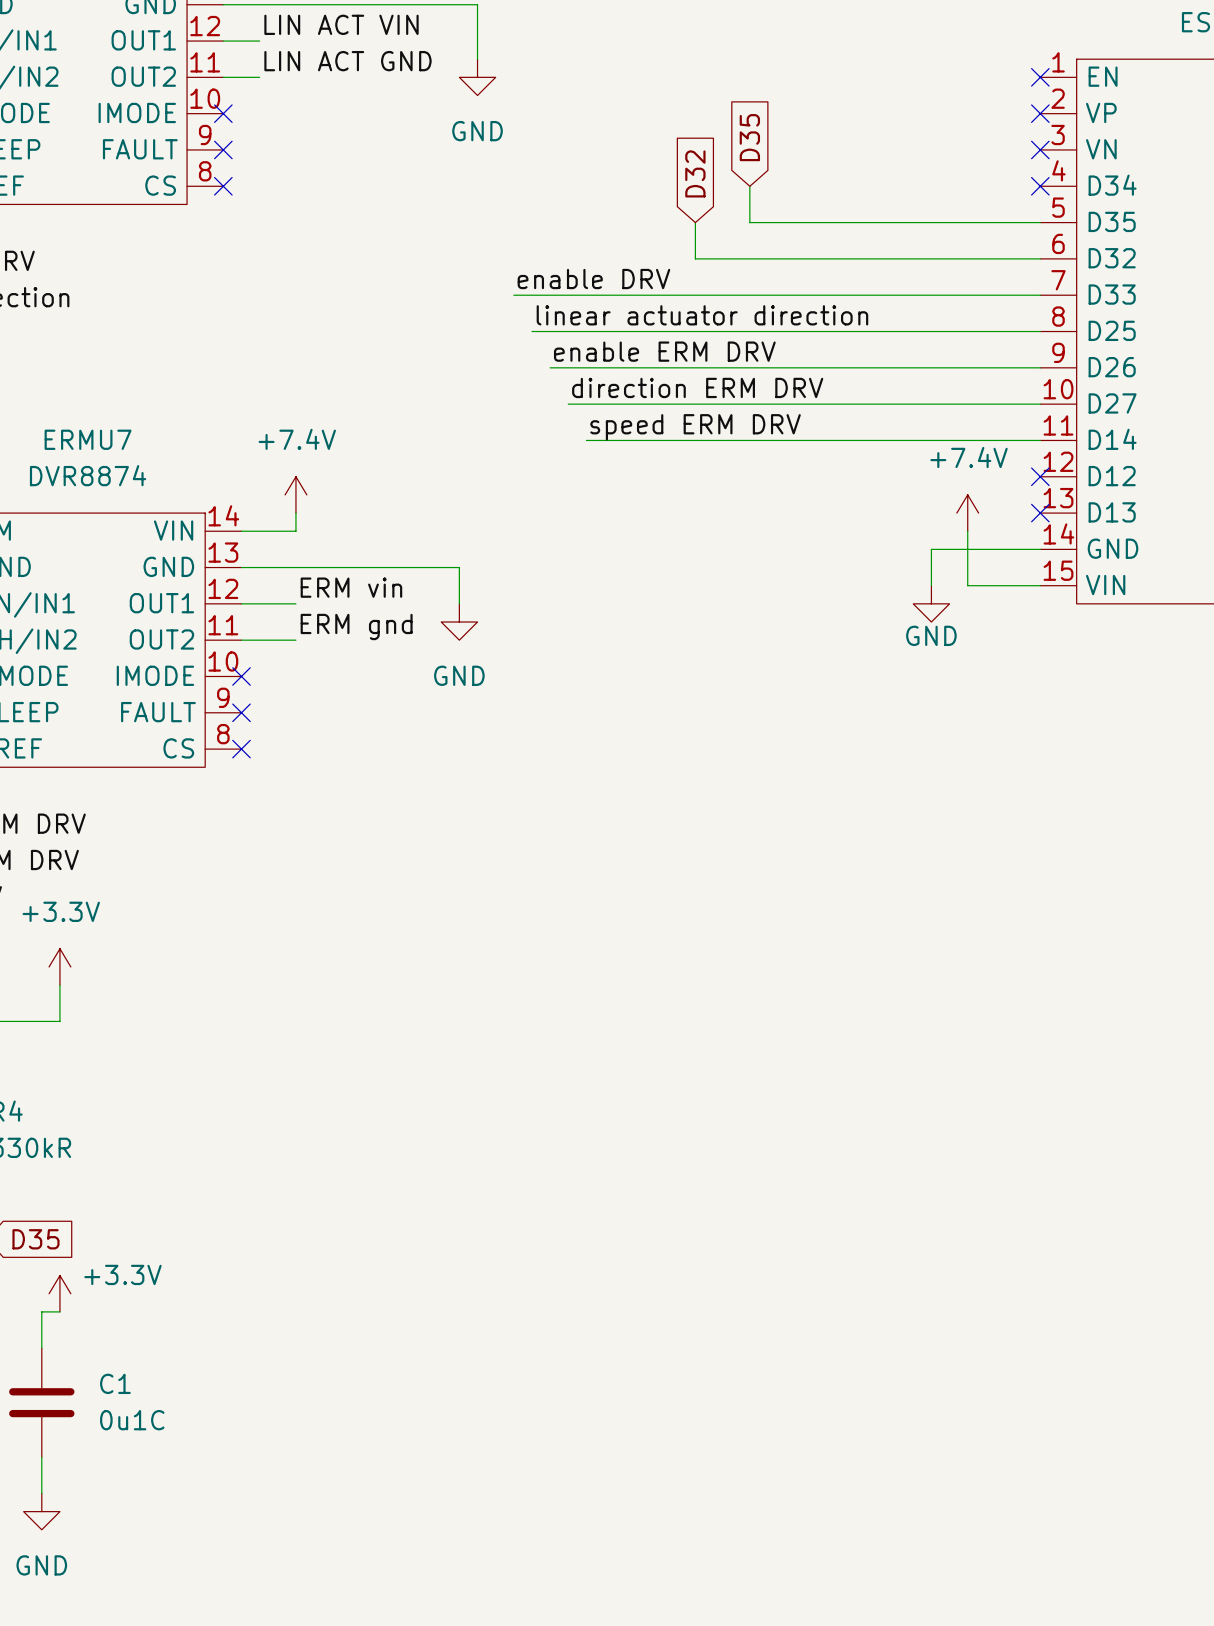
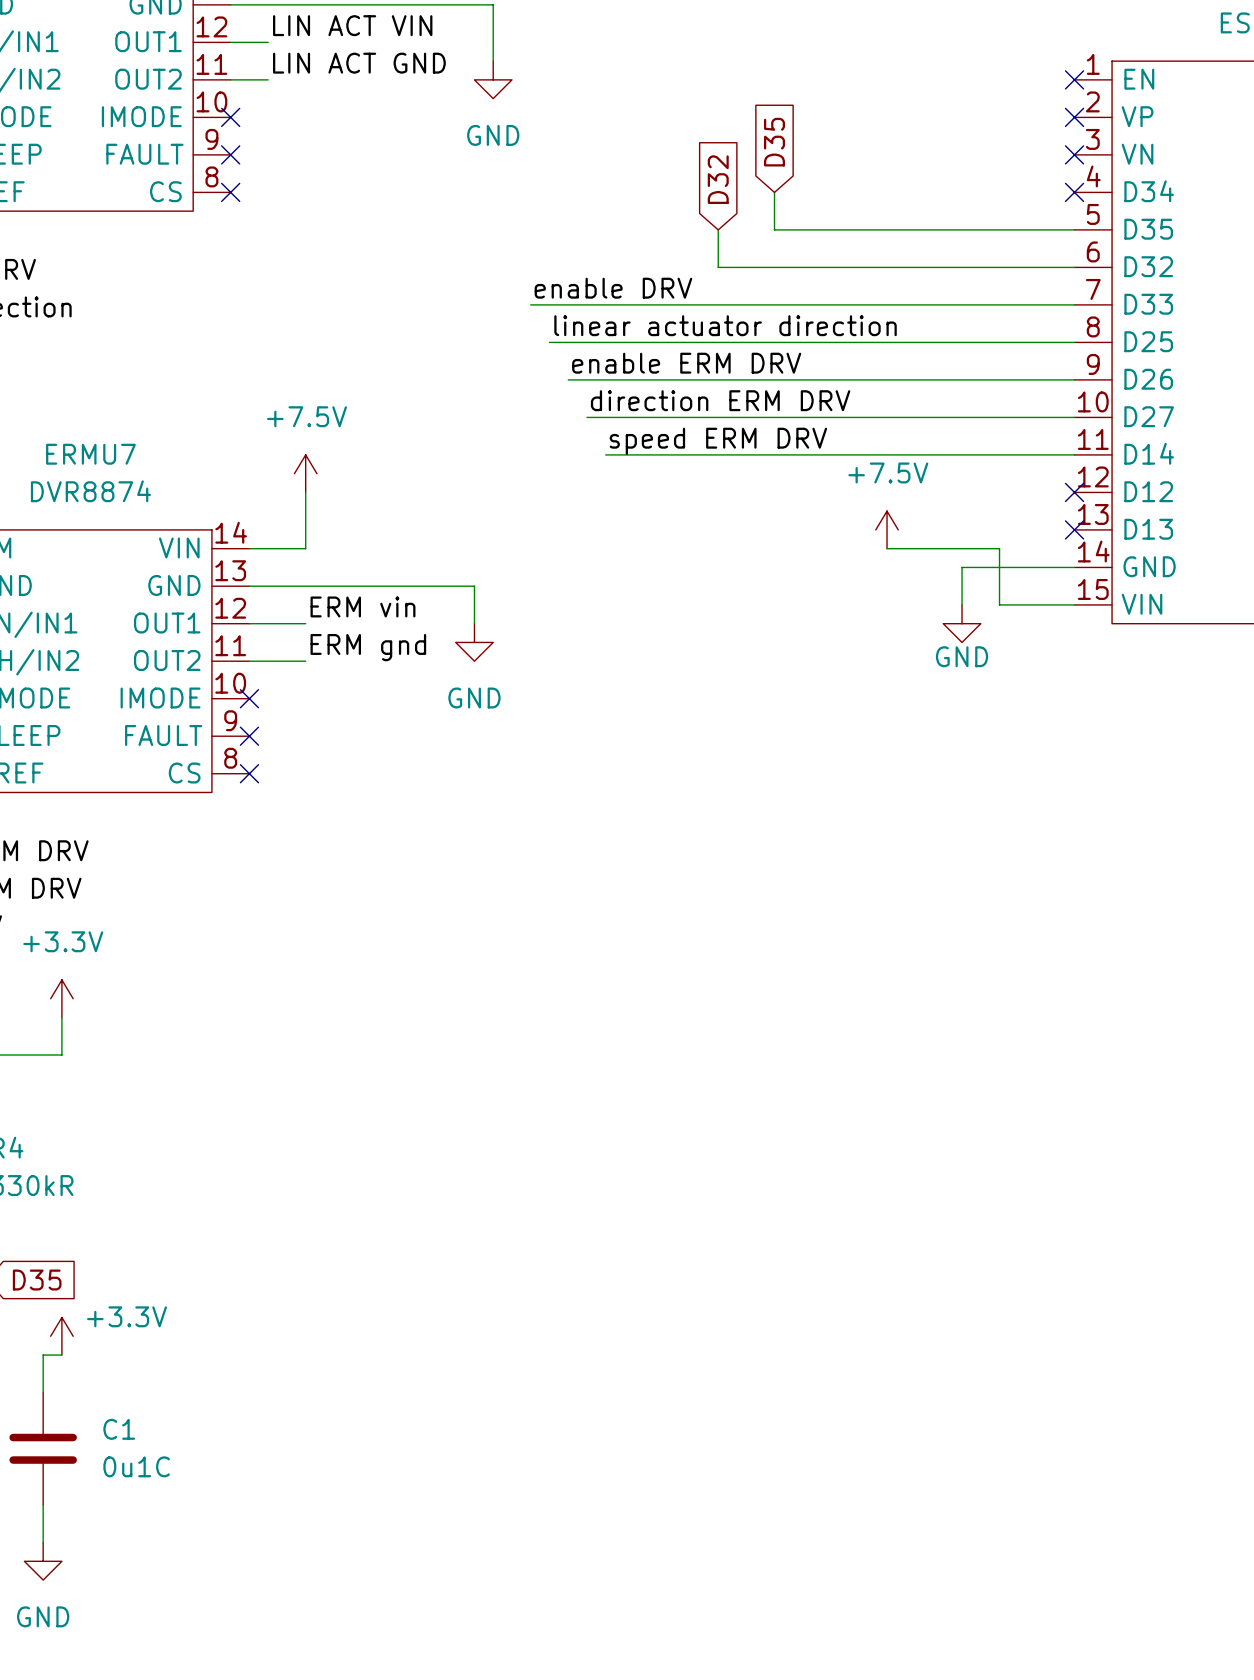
power symbol: none -> +7.5V (305, 473)
power symbol: +7.4V (295, 494) -> none
power symbol: none -> +7.5V (887, 529)
power symbol: +7.4V (967, 513) -> none
wire: none -> (887, 548) (999, 548)

